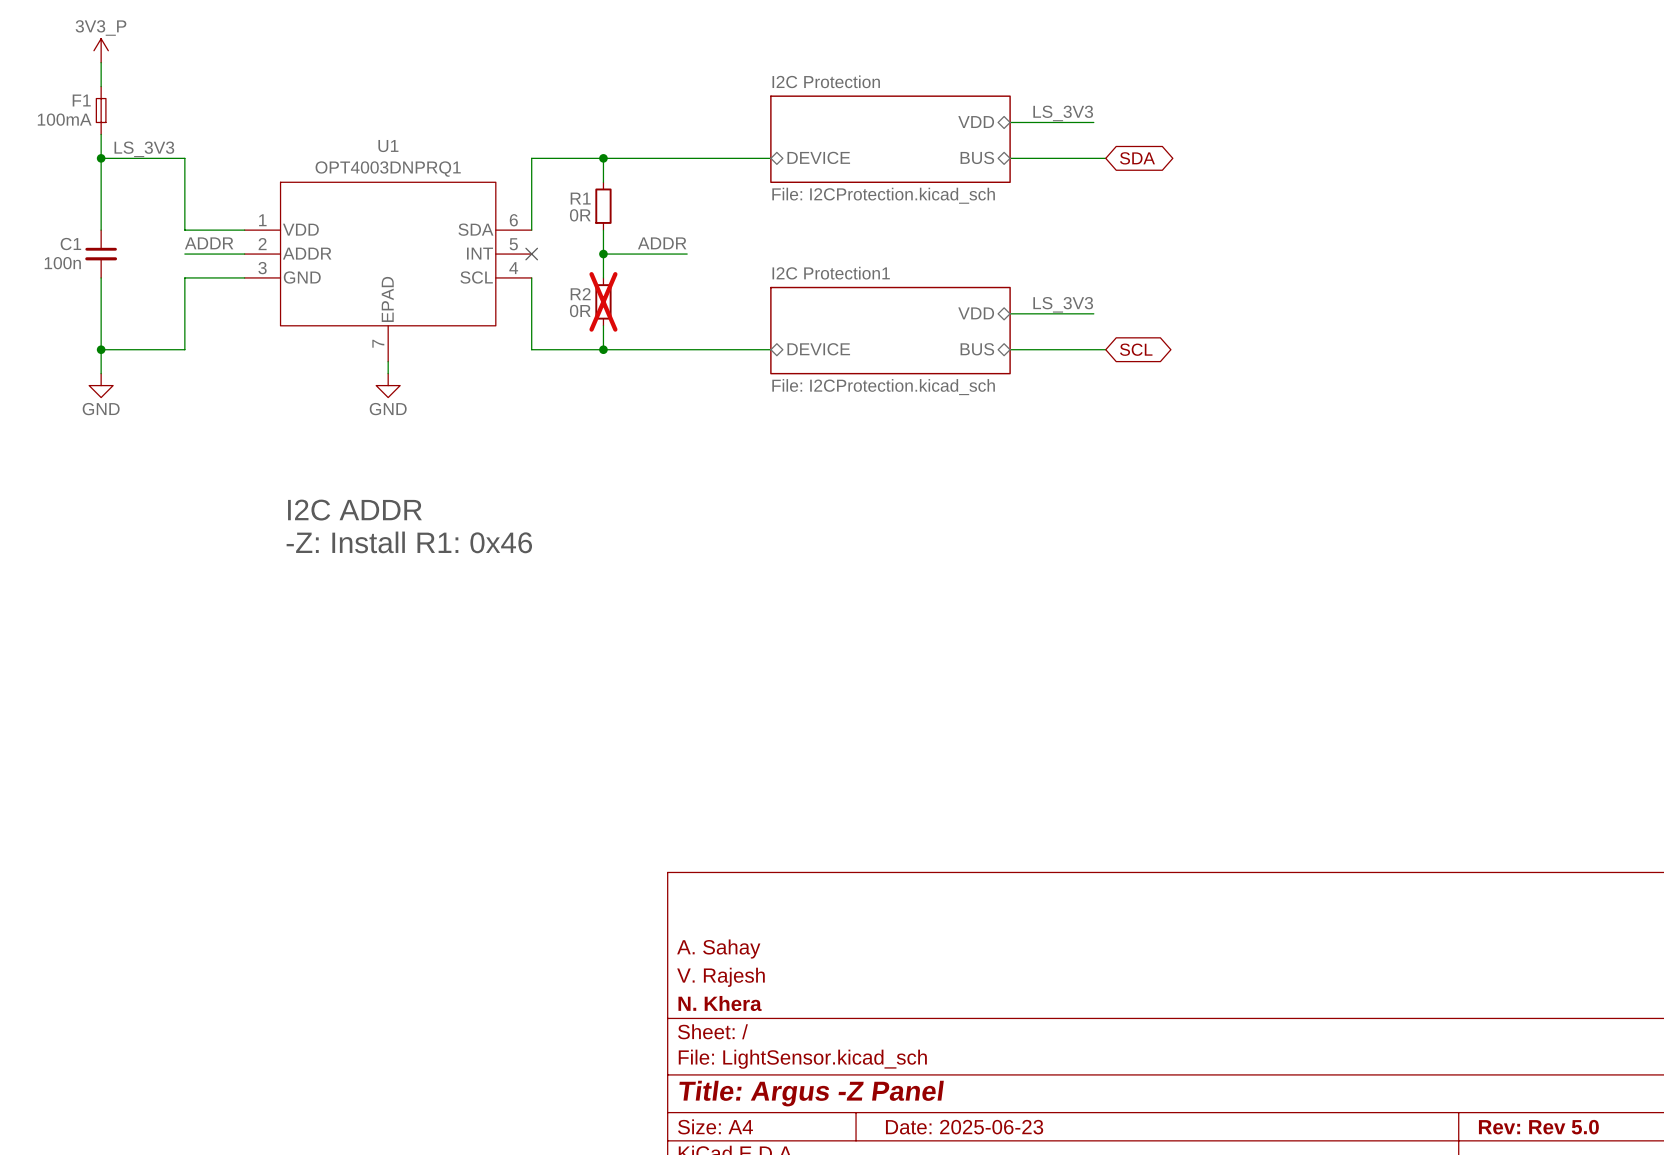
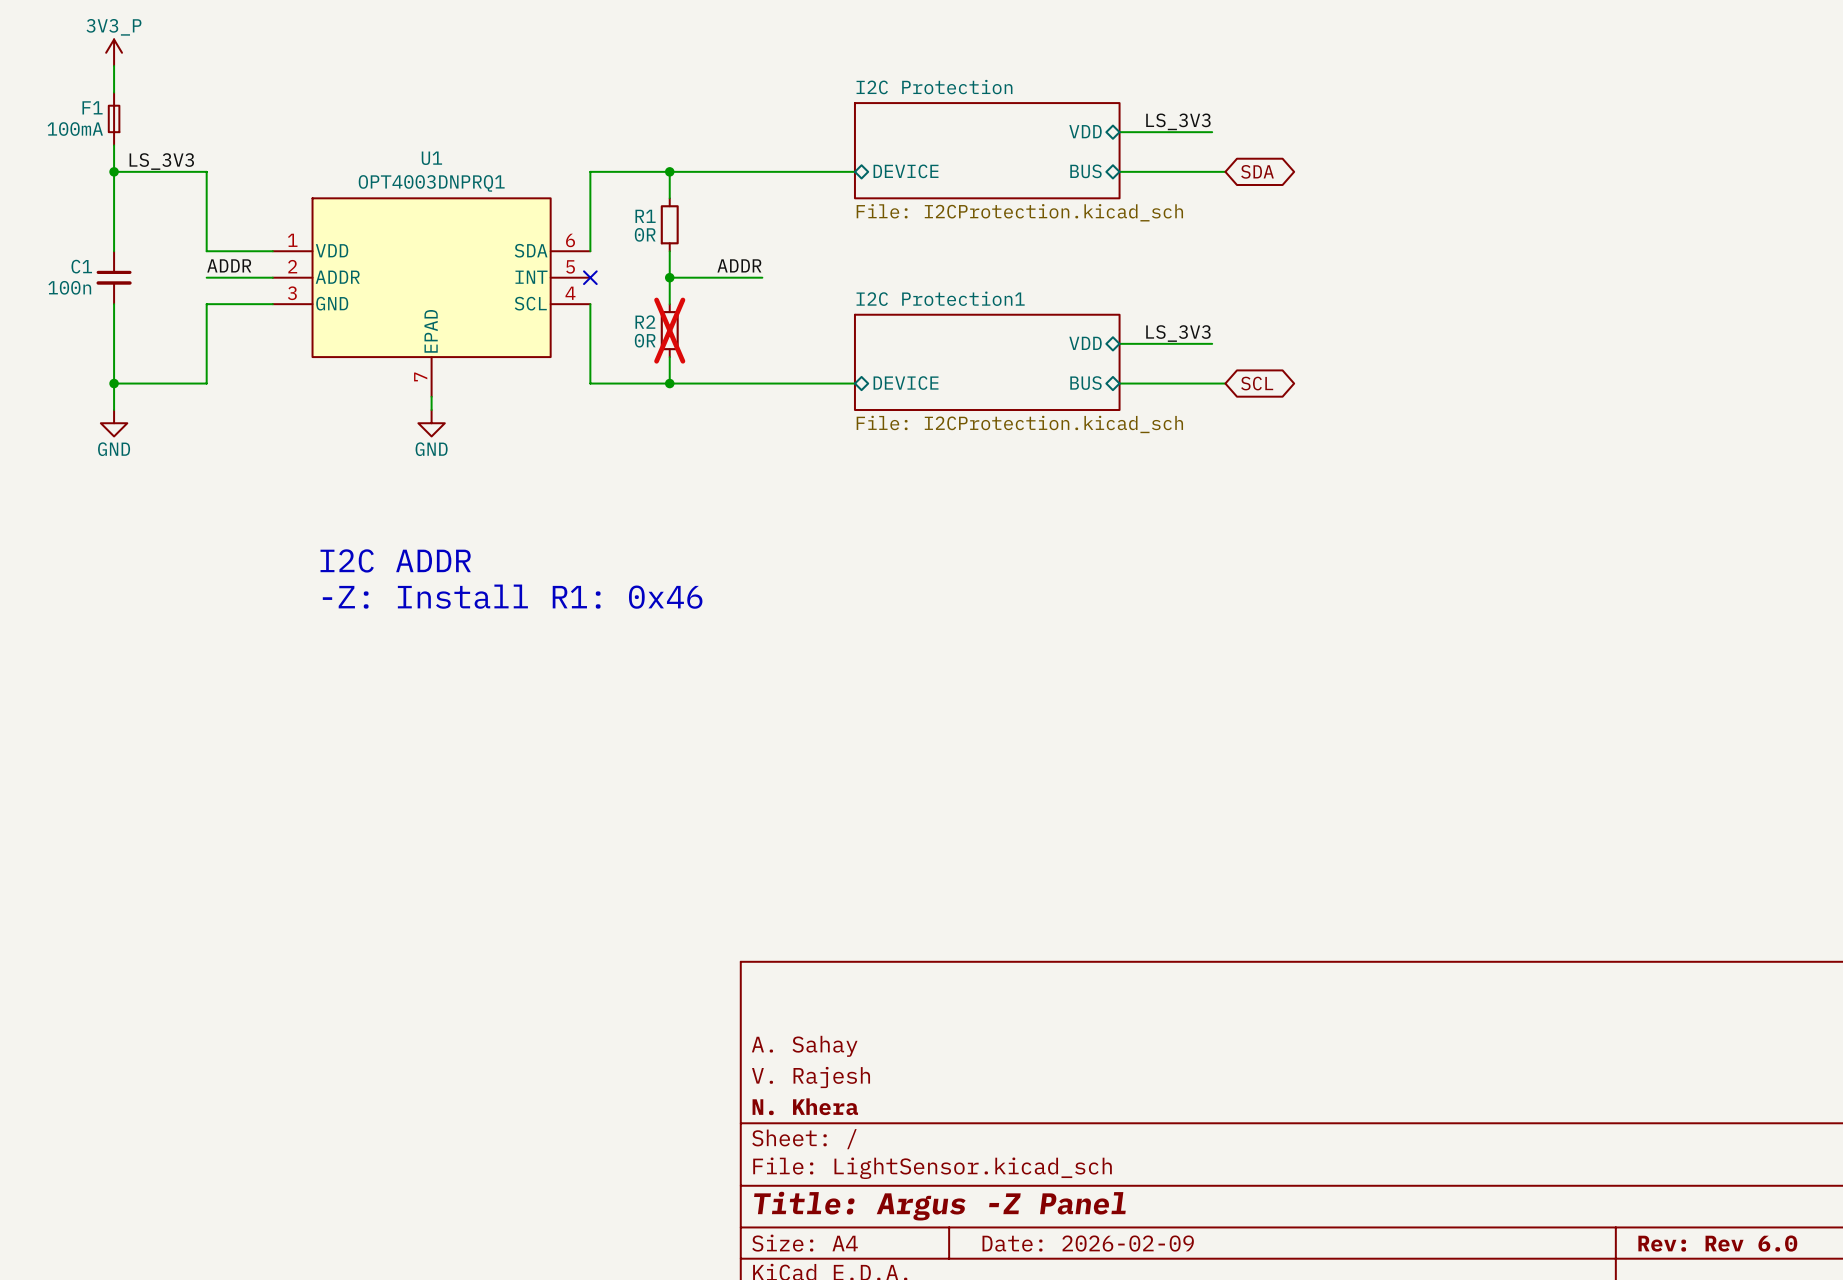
title block: Date: 2025-06-23 (964, 1127) -> Date: 2026-02-09 (1088, 1243)
title block: Rev: Rev 5.0 (1538, 1127) -> Rev: Rev 6.0 (1717, 1243)

